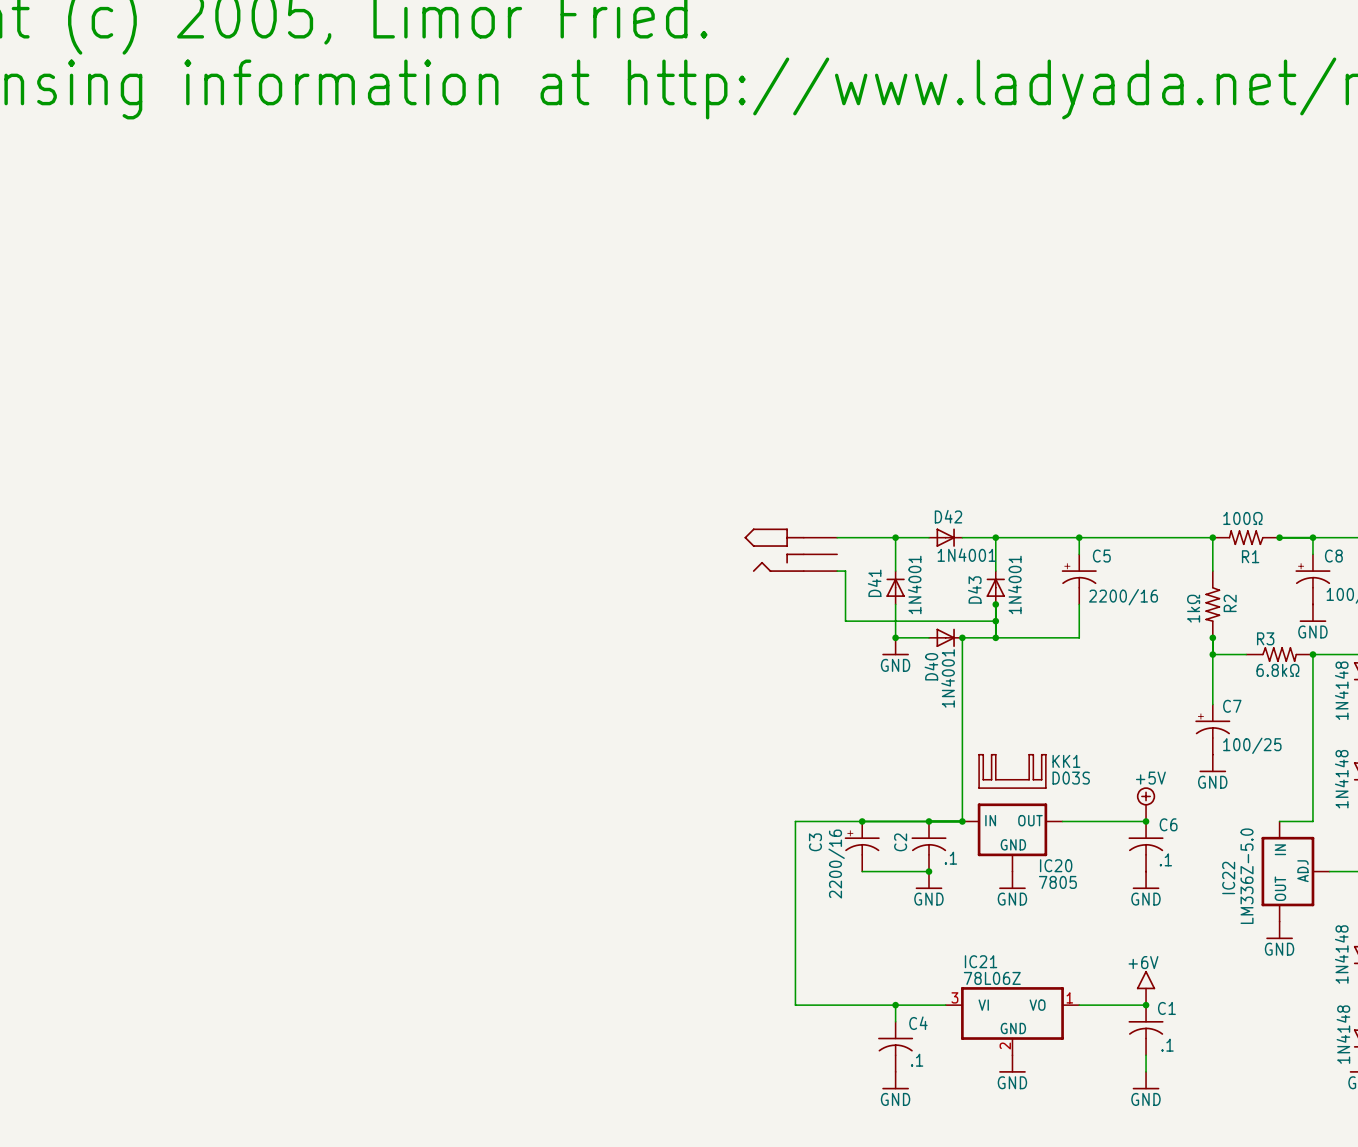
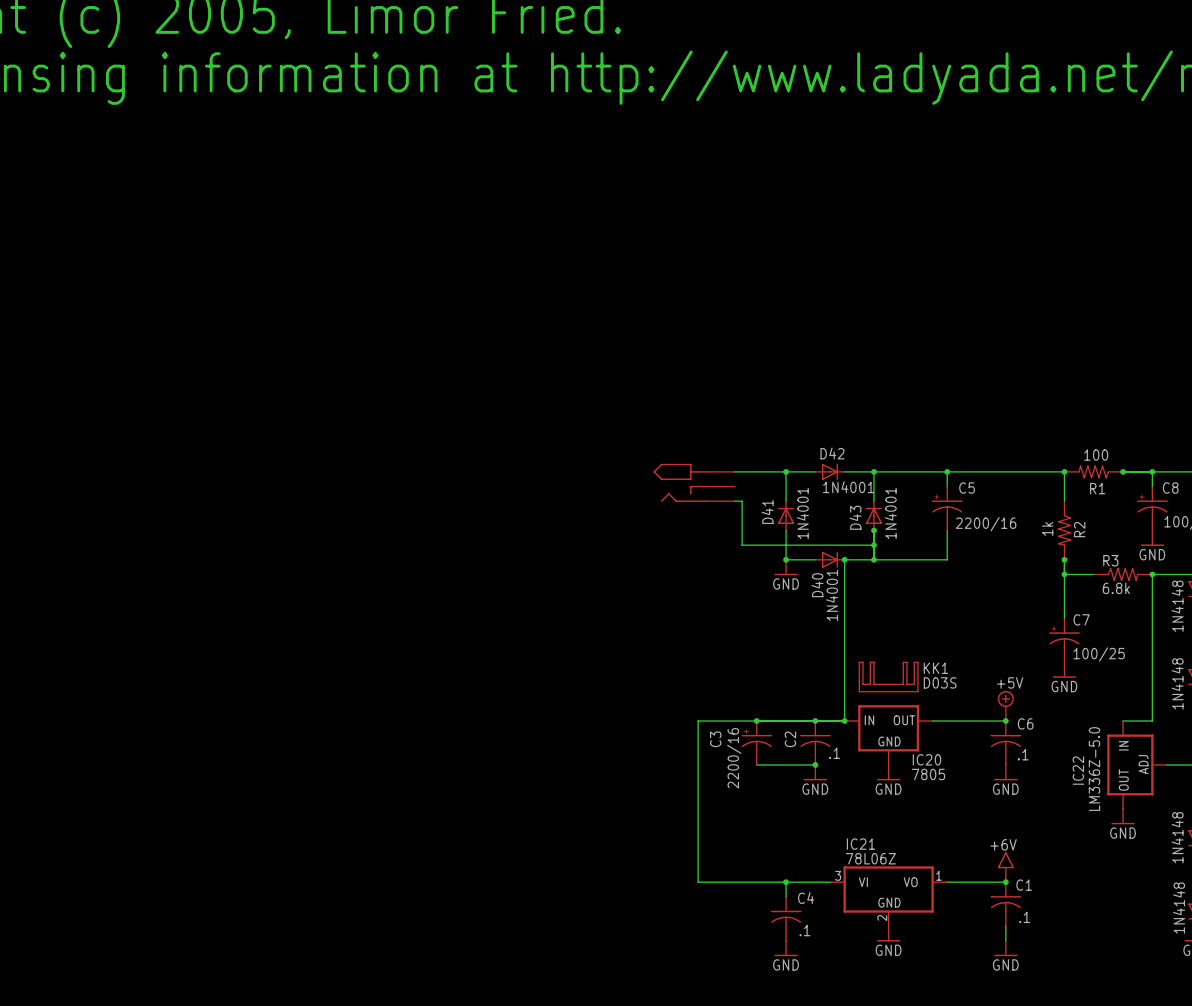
R1 value: 100Ω (1242, 518) -> 100 (1096, 455)
R2 value: 1kΩ (1193, 608) -> 1k (1047, 528)
R3 value: 6.8kΩ (1277, 670) -> 6.8k (1116, 588)

